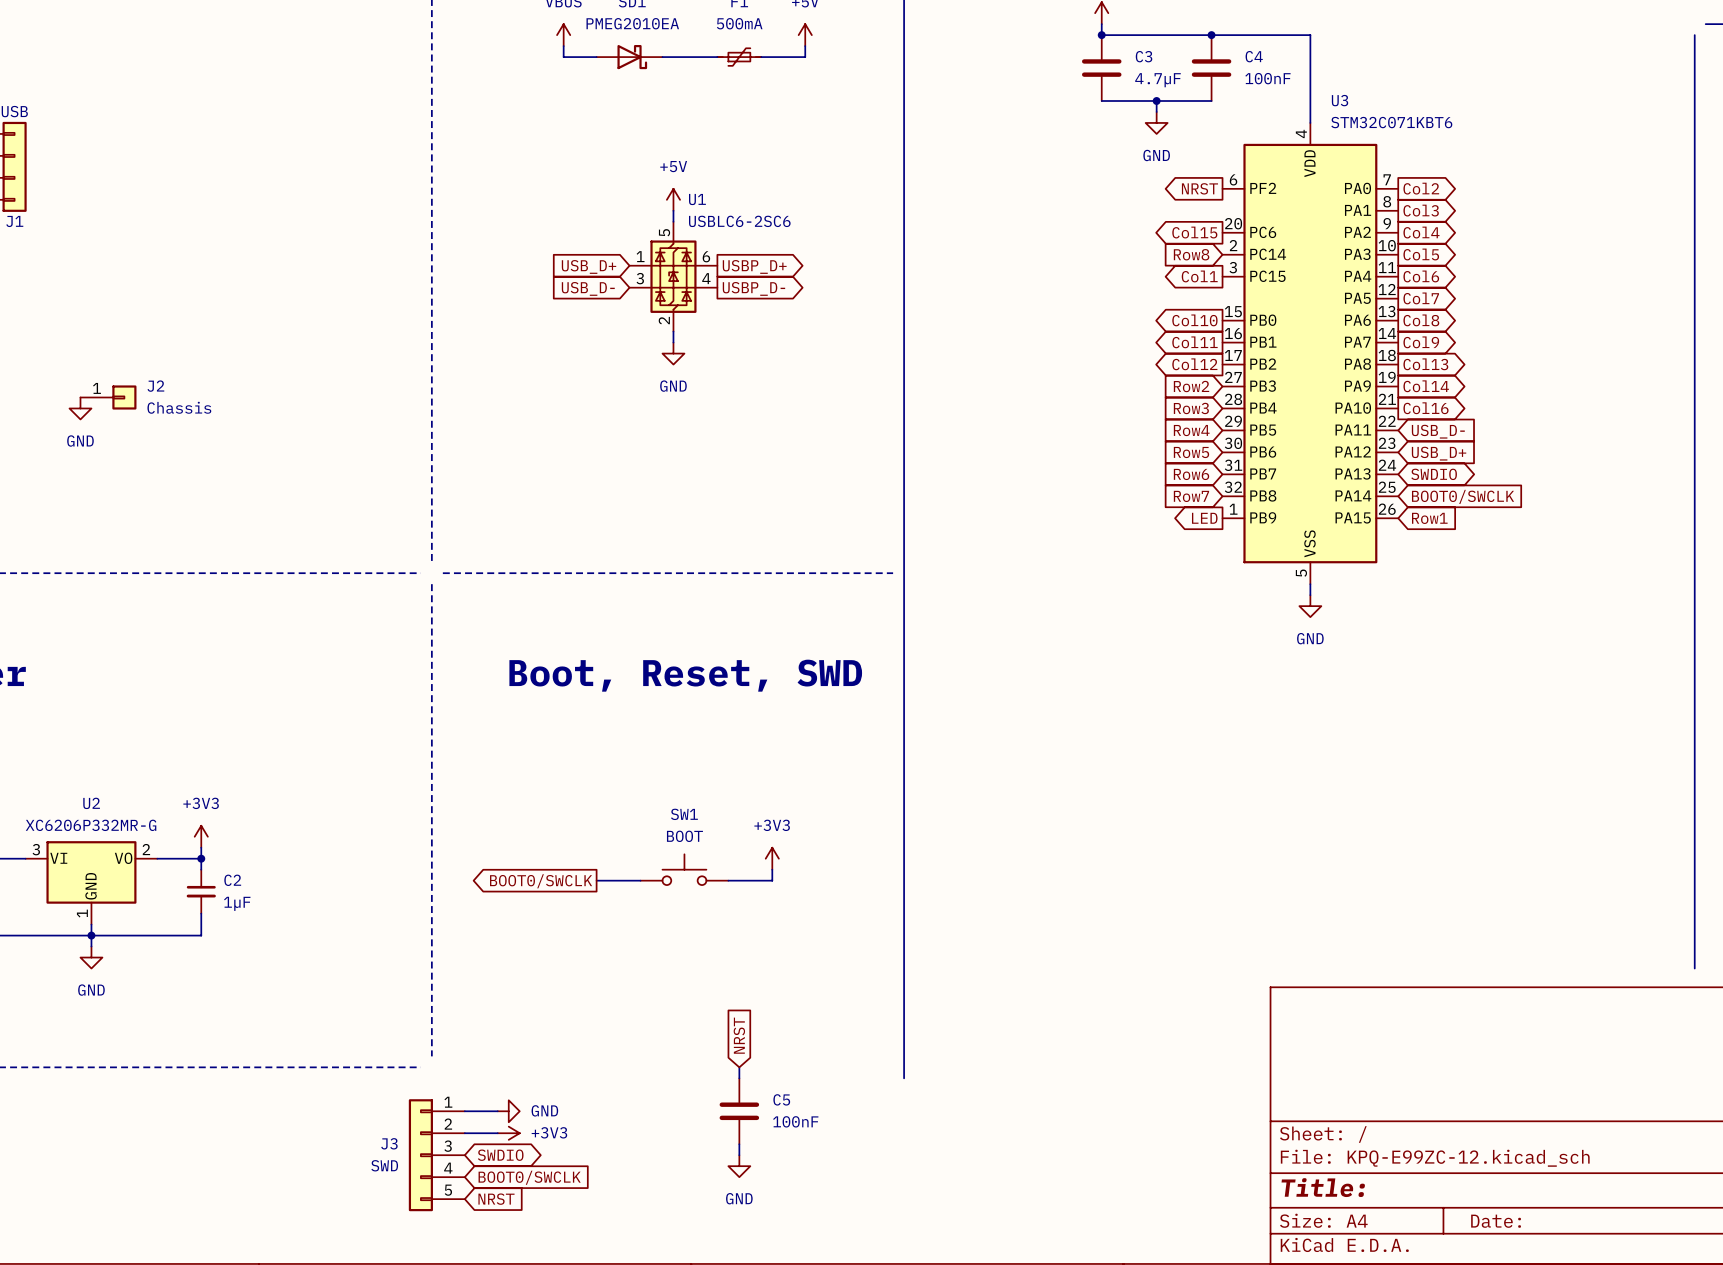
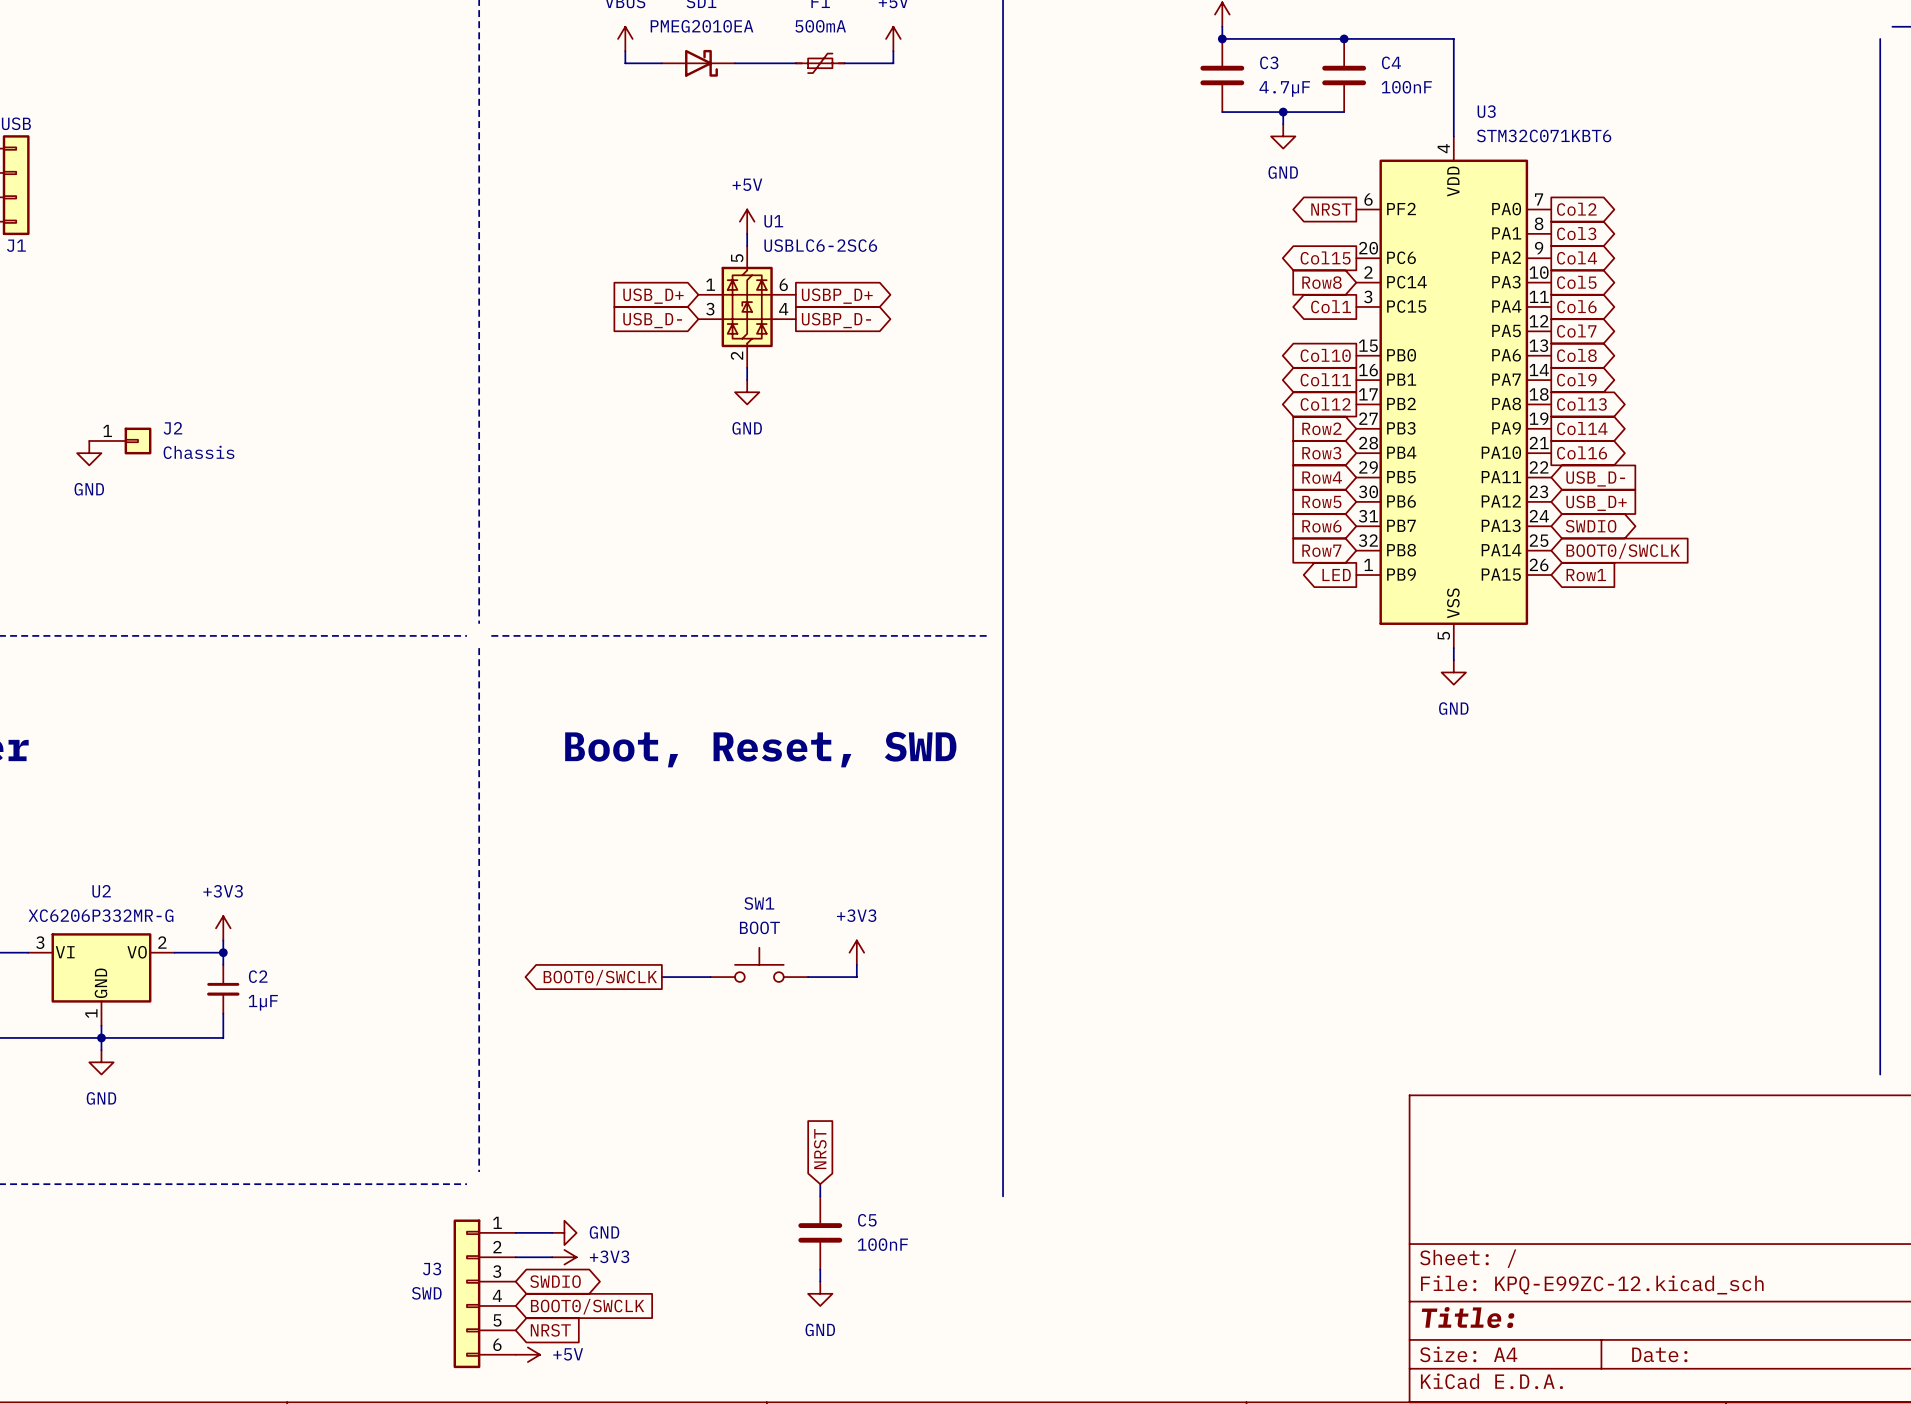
J3 symbol: [408, 1099, 465, 1212] -> [453, 1219, 516, 1369]
power symbol: none -> +5V (527, 1354)

